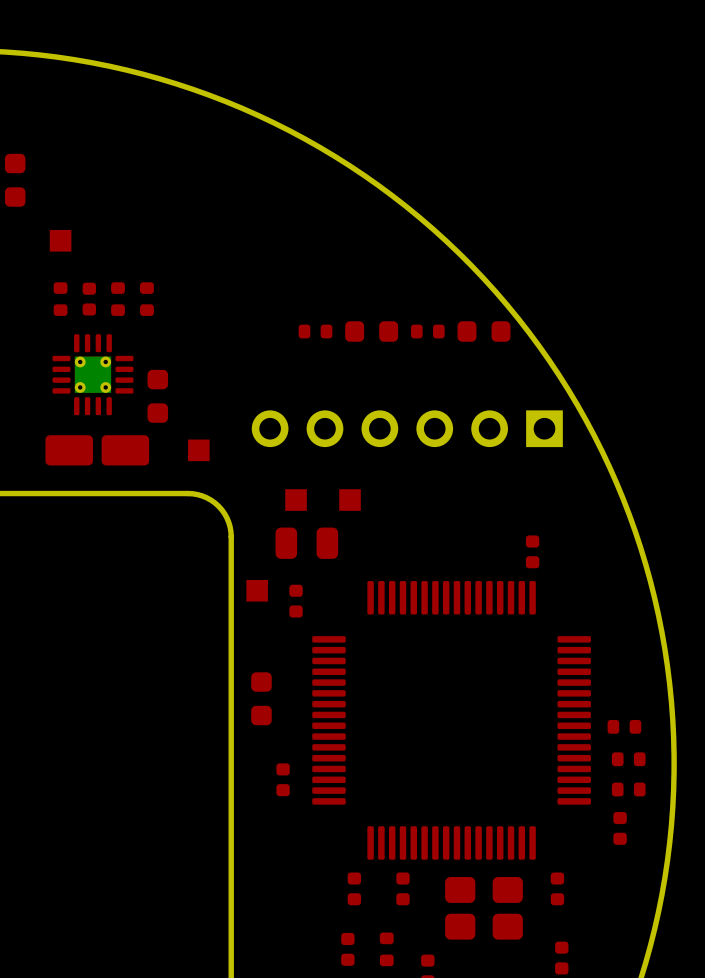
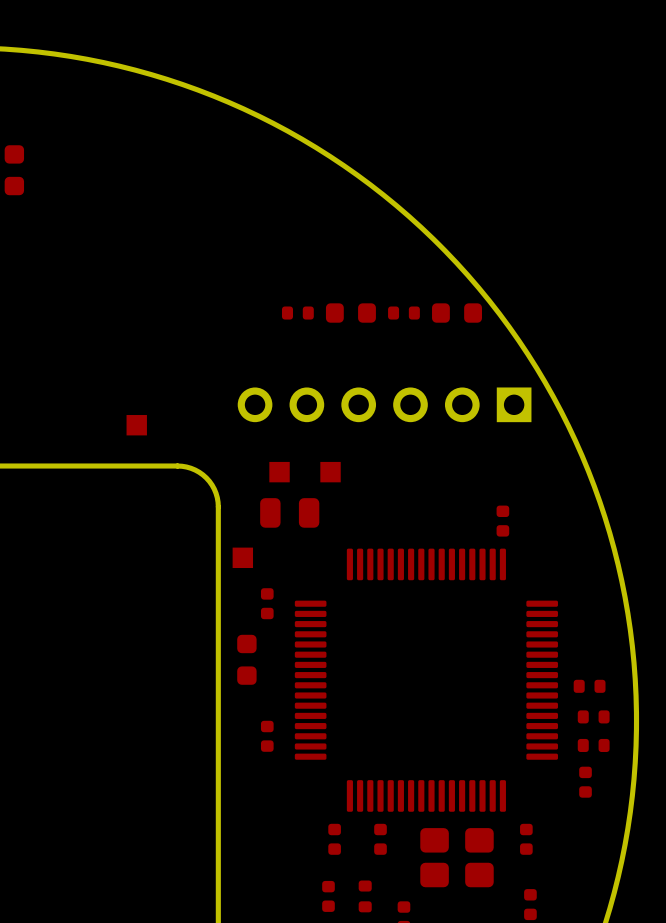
part: (60, 240) -> none
part: (60, 299) -> none
part: (89, 299) -> none
part: (118, 299) -> none
part: (146, 299) -> none
part: (92, 374) -> none
part: (157, 396) -> none
part: (97, 450) -> none
part position: (198, 450) -> (136, 425)
part position: (296, 601) -> (267, 603)

